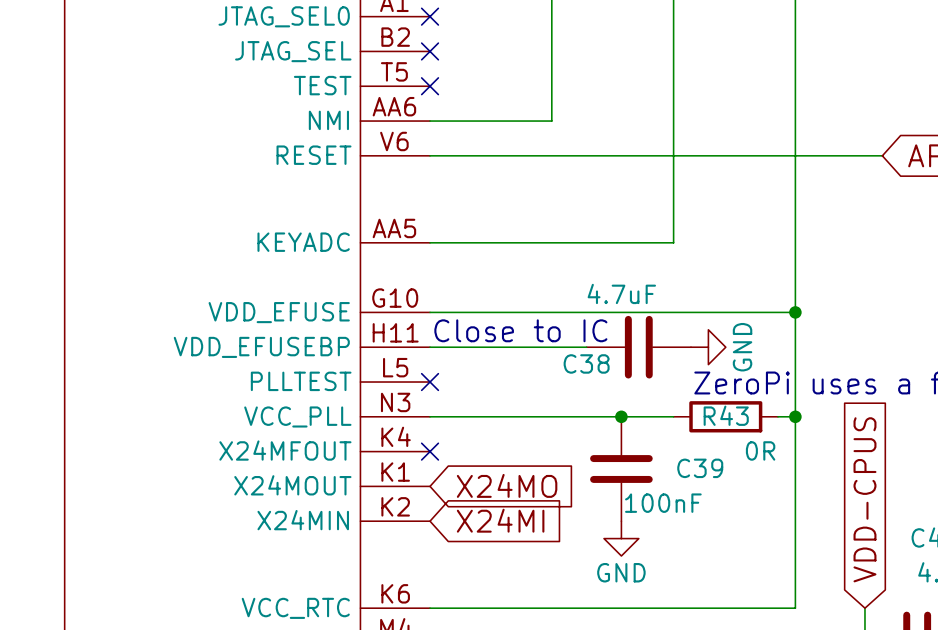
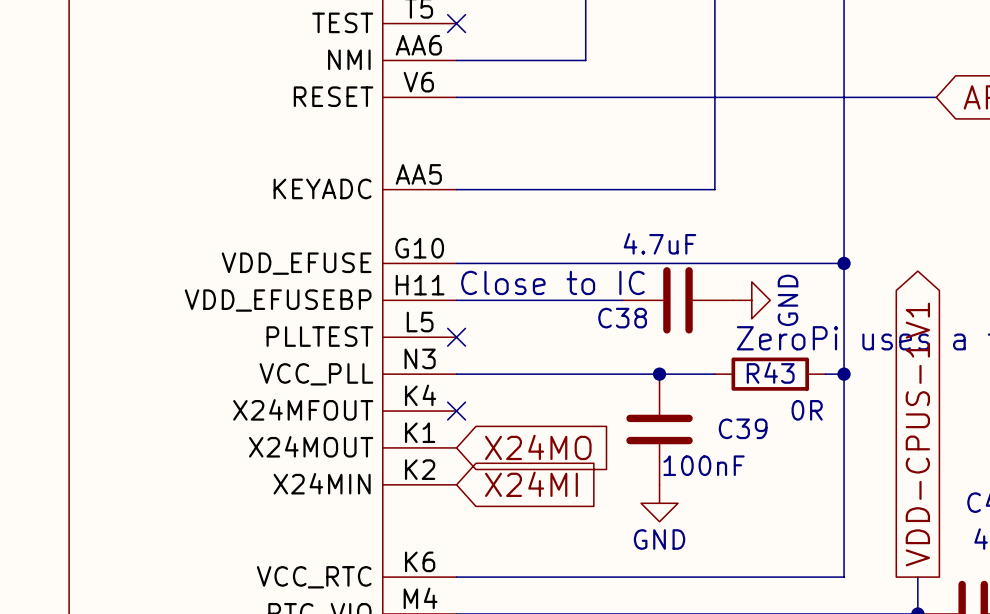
global label shape: input (864, 499) -> output (917, 434)
global label: VDD-CPUS (864, 499) -> VDD-CPUS-1V1 (917, 434)

